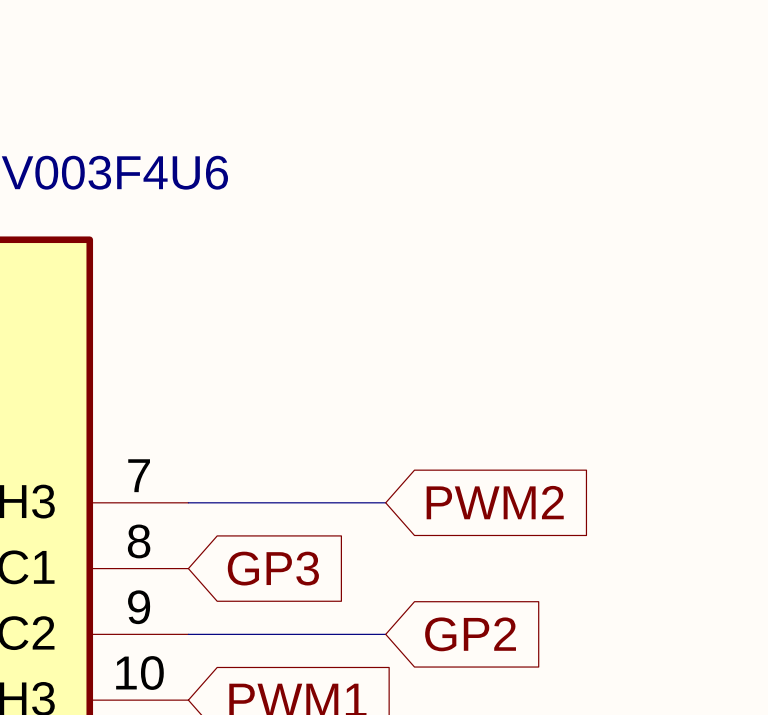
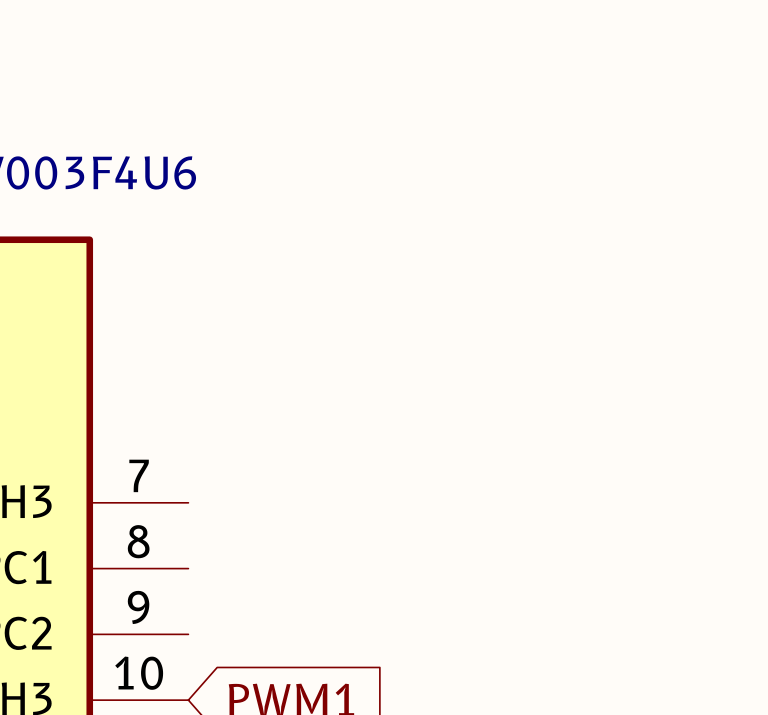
wire: (188, 502) (385, 502) -> none
global label: PWM2 (495, 502) -> none
global label: GP3 (273, 568) -> none
wire: (188, 634) (385, 634) -> none
global label: GP2 (470, 634) -> none

